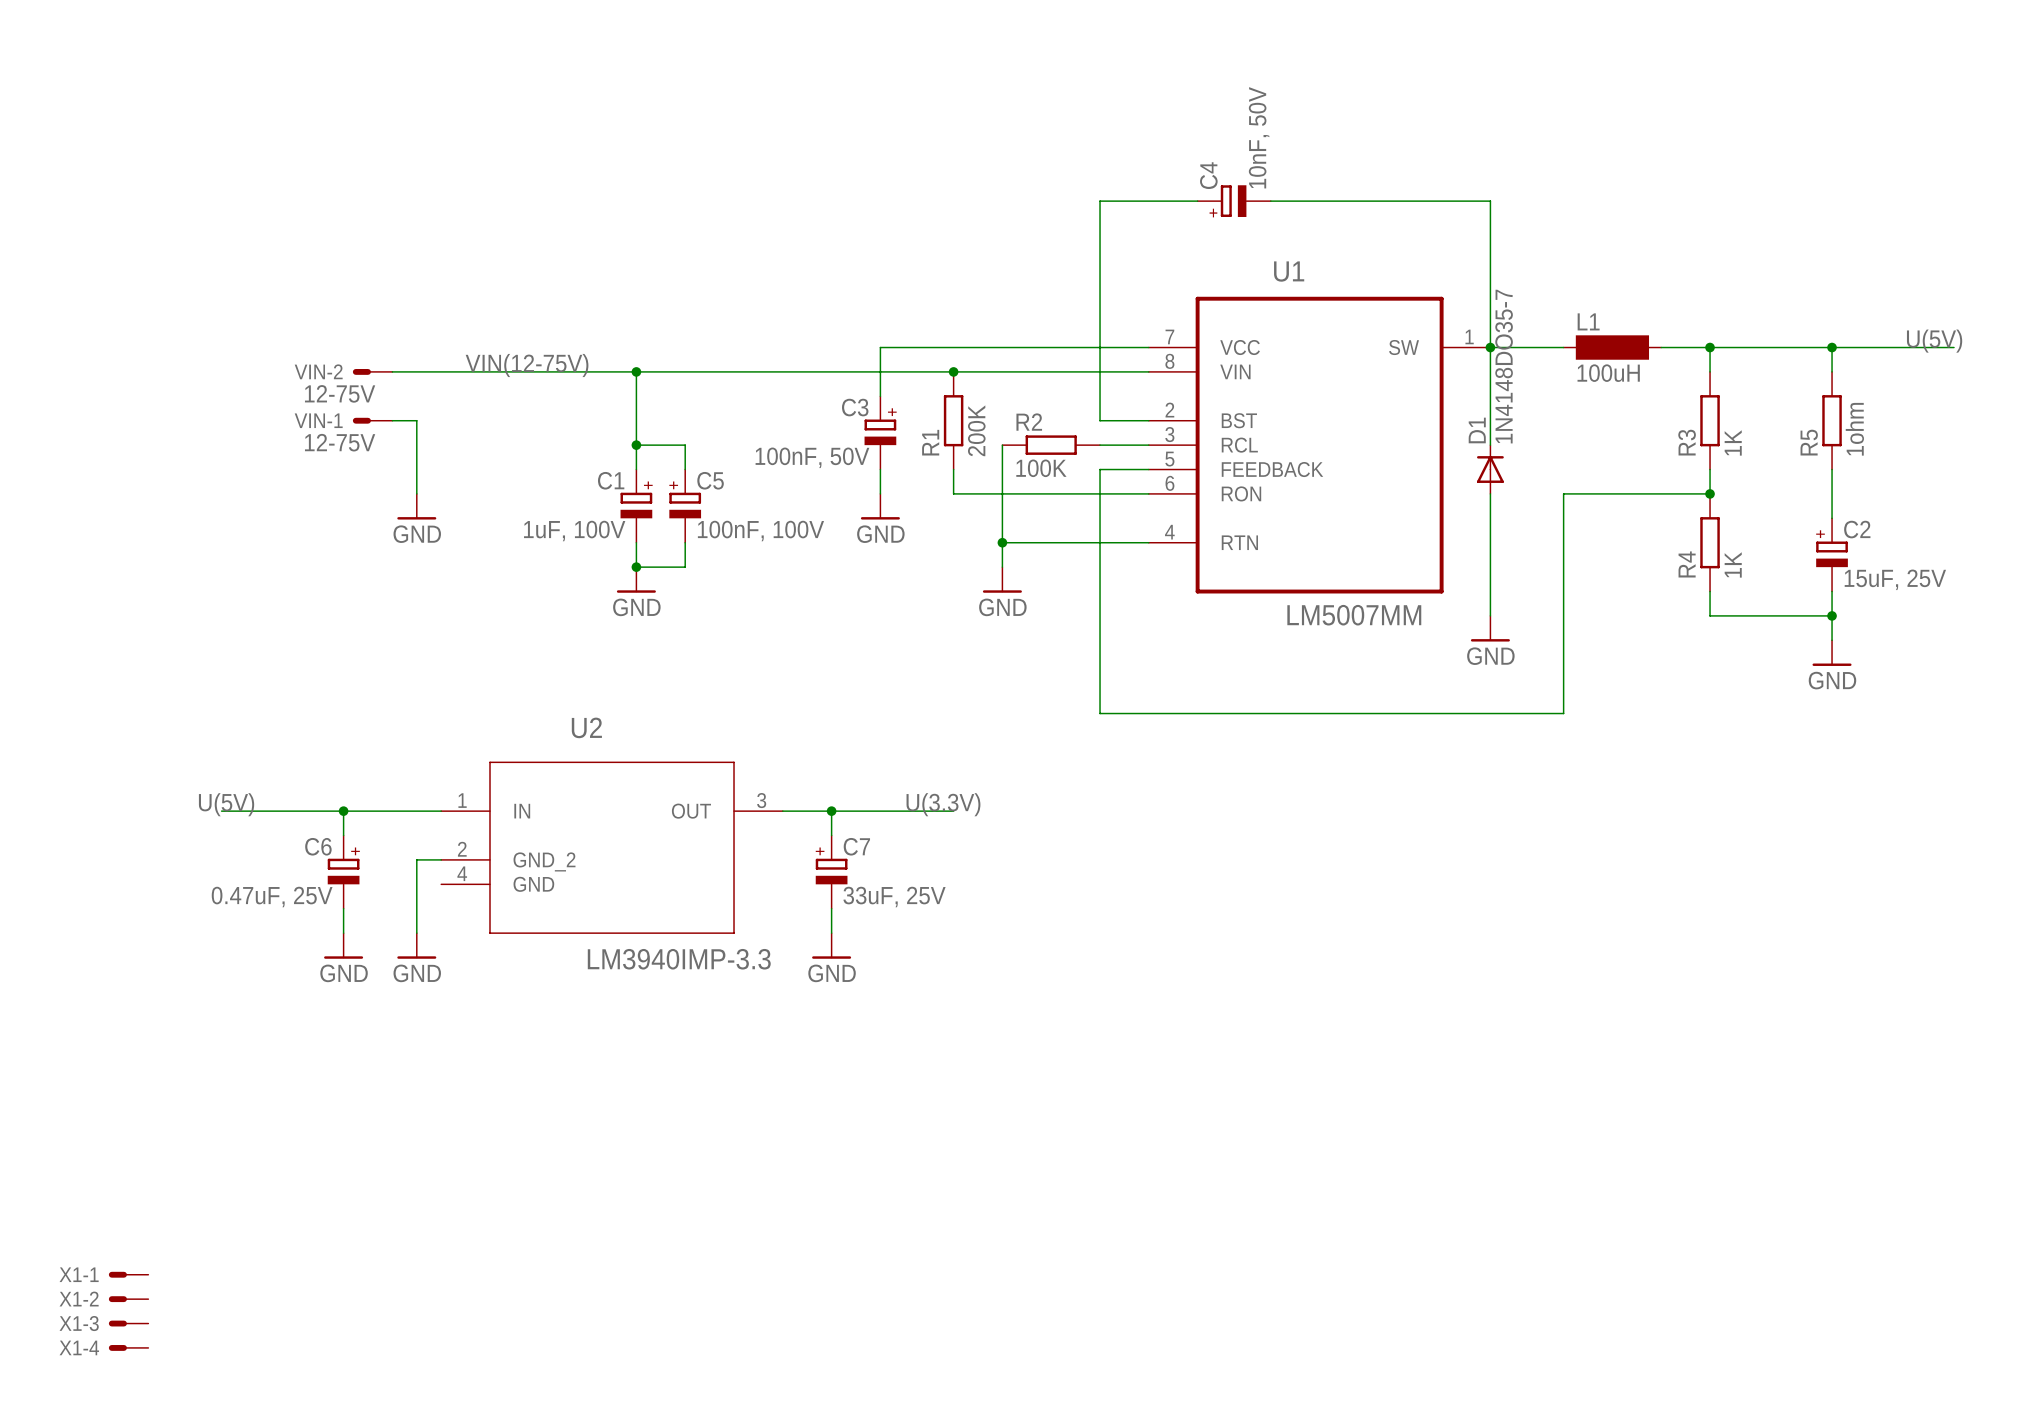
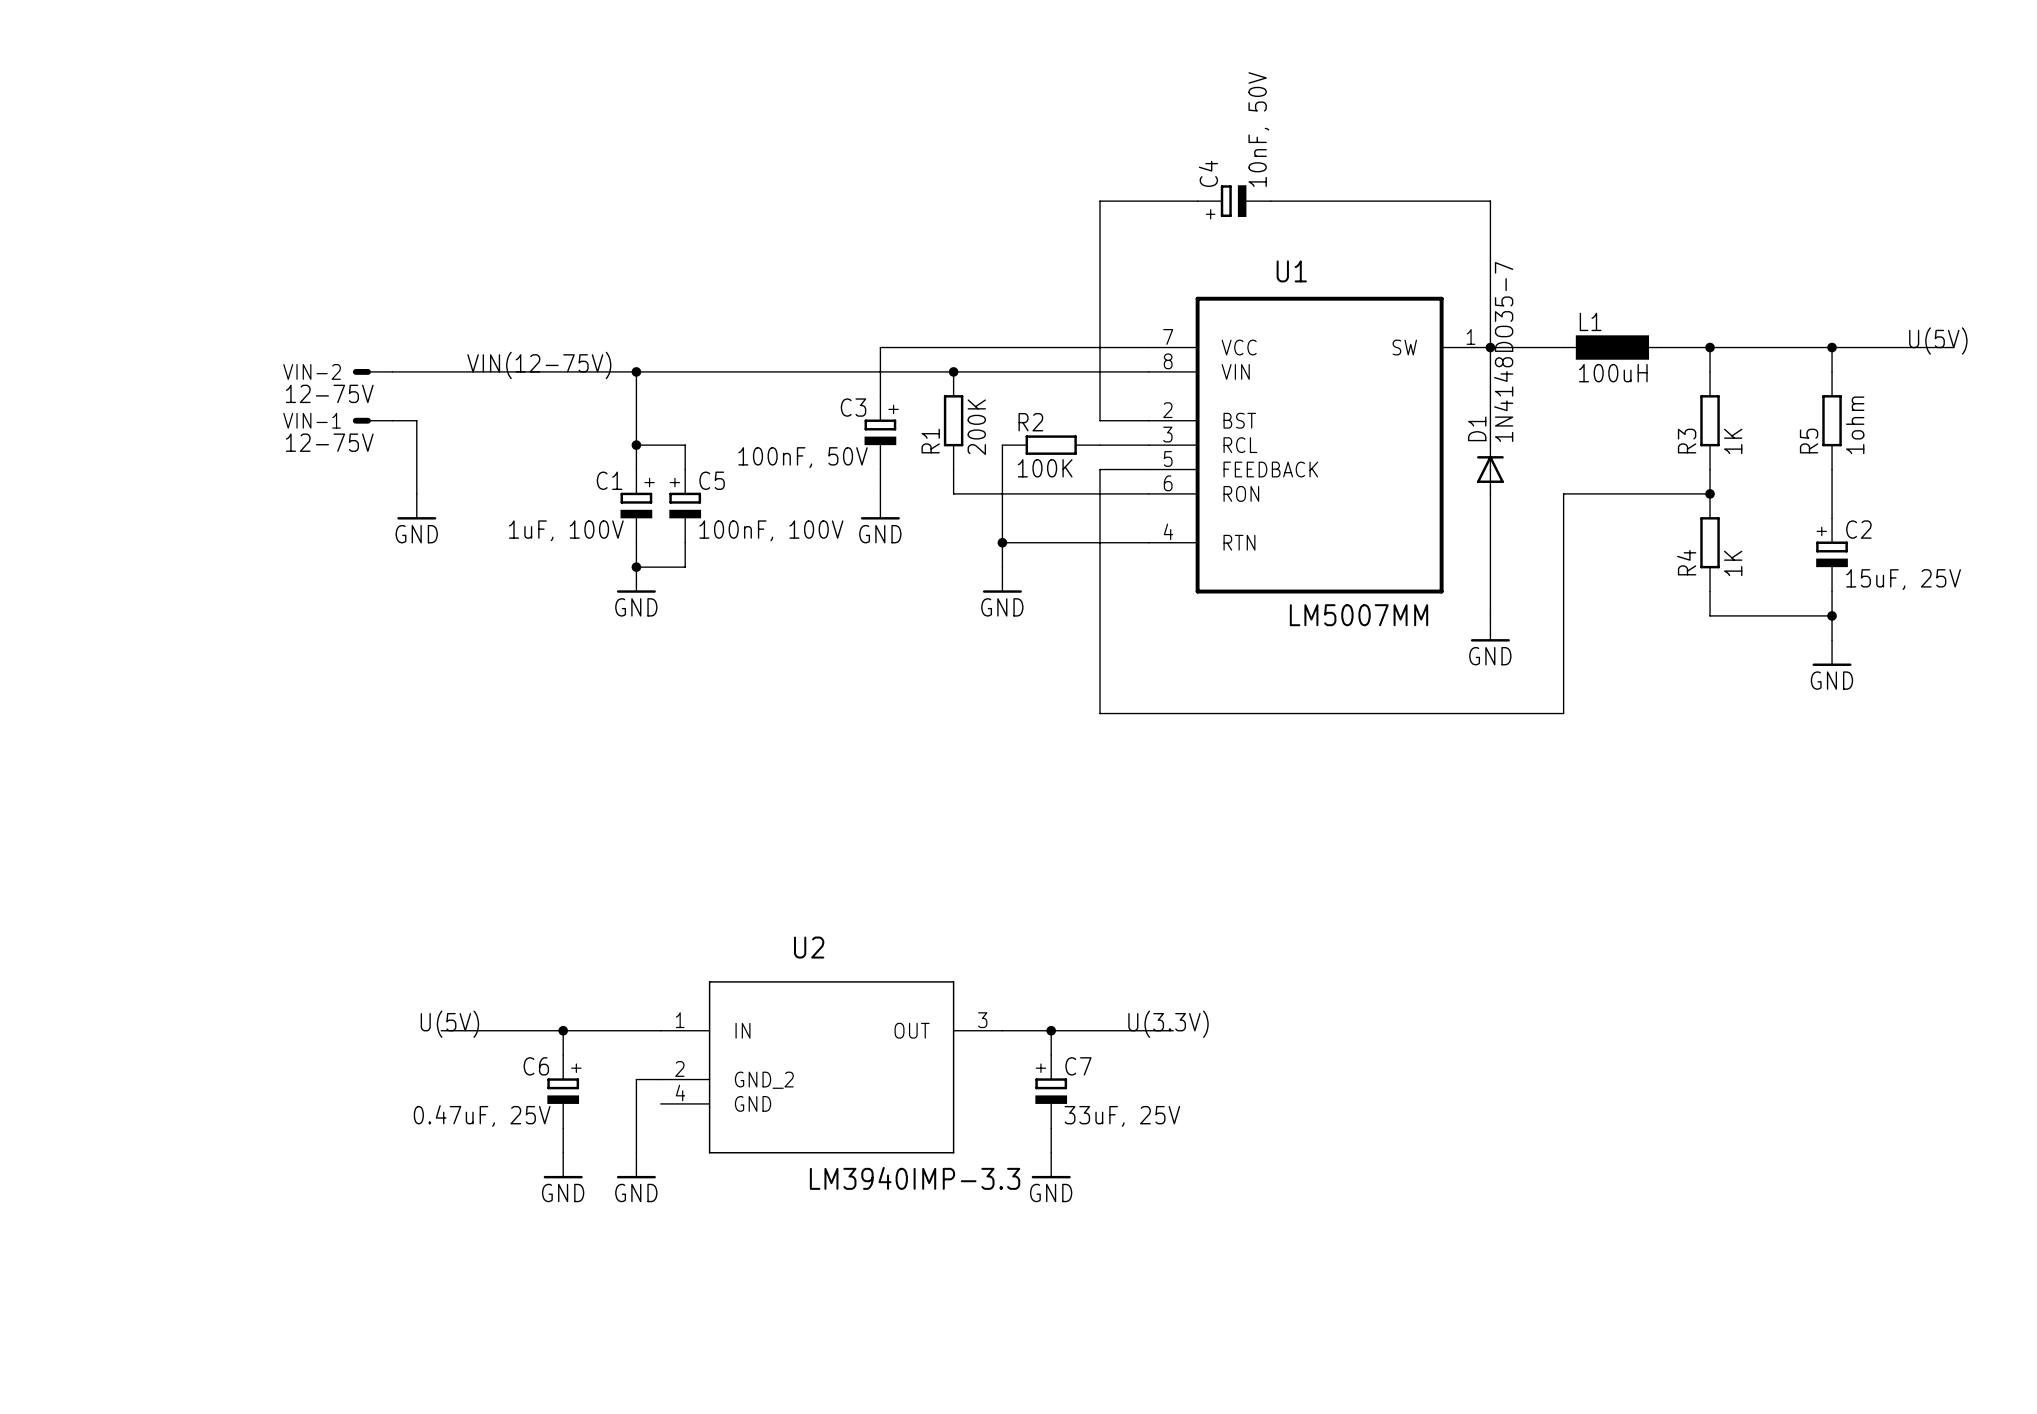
label: U(5V) (226, 804) -> none
label: U(3.3V) (943, 804) -> none
wire: (221, 811) (441, 811) -> none
wire: (343, 811) (343, 835) -> none
junction: (343, 811) -> none
wire: (782, 811) (953, 811) -> none
wire: (831, 811) (831, 835) -> none
junction: (831, 811) -> none
U2 position: (612, 847) -> (831, 1067)
wire: (441, 859) (416, 859) (416, 933) -> none
C6 position: (343, 872) -> (563, 1091)
C7 position: (831, 872) -> (1051, 1091)
wire: (343, 908) (343, 933) -> none
wire: (831, 908) (831, 933) -> none
power symbol: GND (343, 945) -> none
power symbol: GND (416, 945) -> none
power symbol: GND (831, 945) -> none
label: none -> U(5V) (449, 1024)
label: none -> U(3.3V) (1168, 1024)
wire: none -> (441, 1030) (660, 1030)
wire: none -> (563, 1030) (563, 1055)
junction: none -> (563, 1030)
wire: none -> (1002, 1030) (1173, 1030)
wire: none -> (1051, 1030) (1051, 1055)
junction: none -> (1051, 1030)
wire: none -> (660, 1079) (636, 1079) (636, 1152)
wire: none -> (563, 1128) (563, 1152)
wire: none -> (1051, 1128) (1051, 1152)
power symbol: none -> GND (563, 1165)
power symbol: none -> GND (636, 1165)
power symbol: none -> GND (1051, 1165)
X1-1: (128, 1274) -> none
X1-2: (128, 1299) -> none
X1-3: (128, 1323) -> none
X1-4: (128, 1347) -> none

